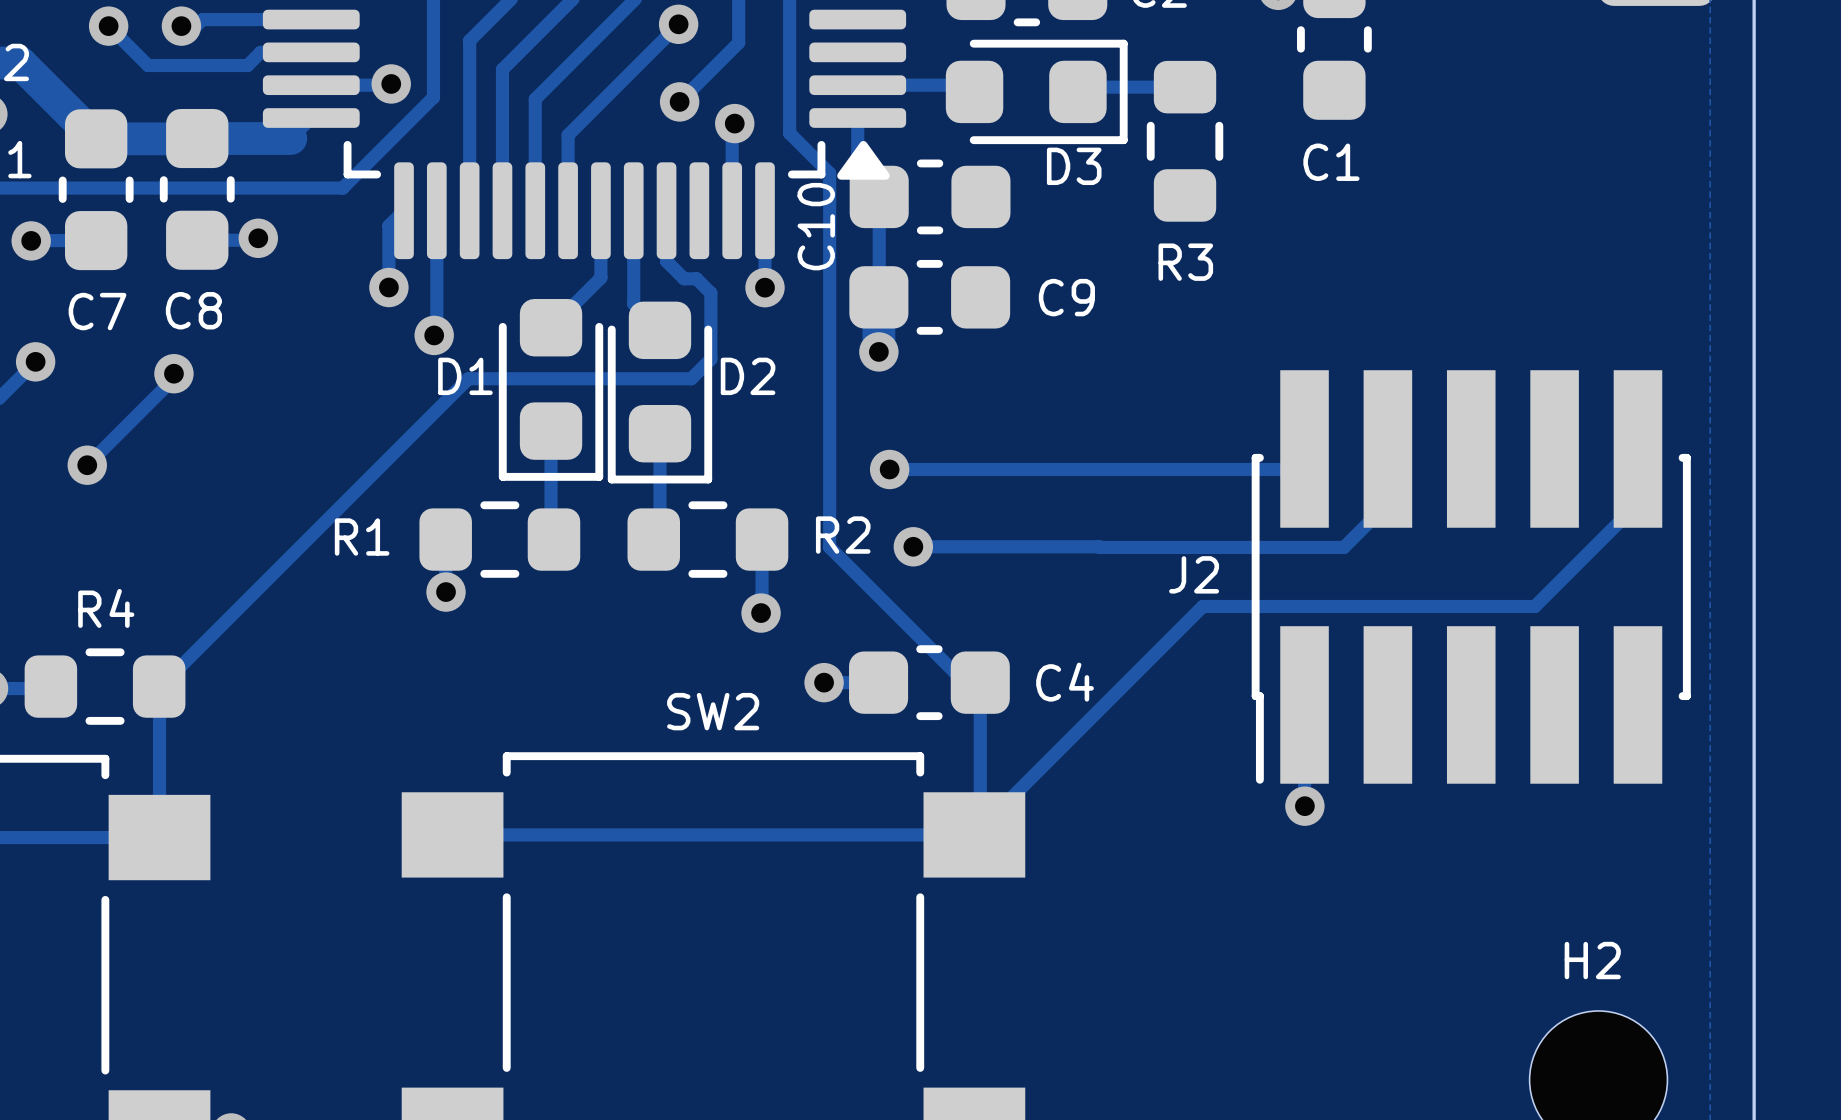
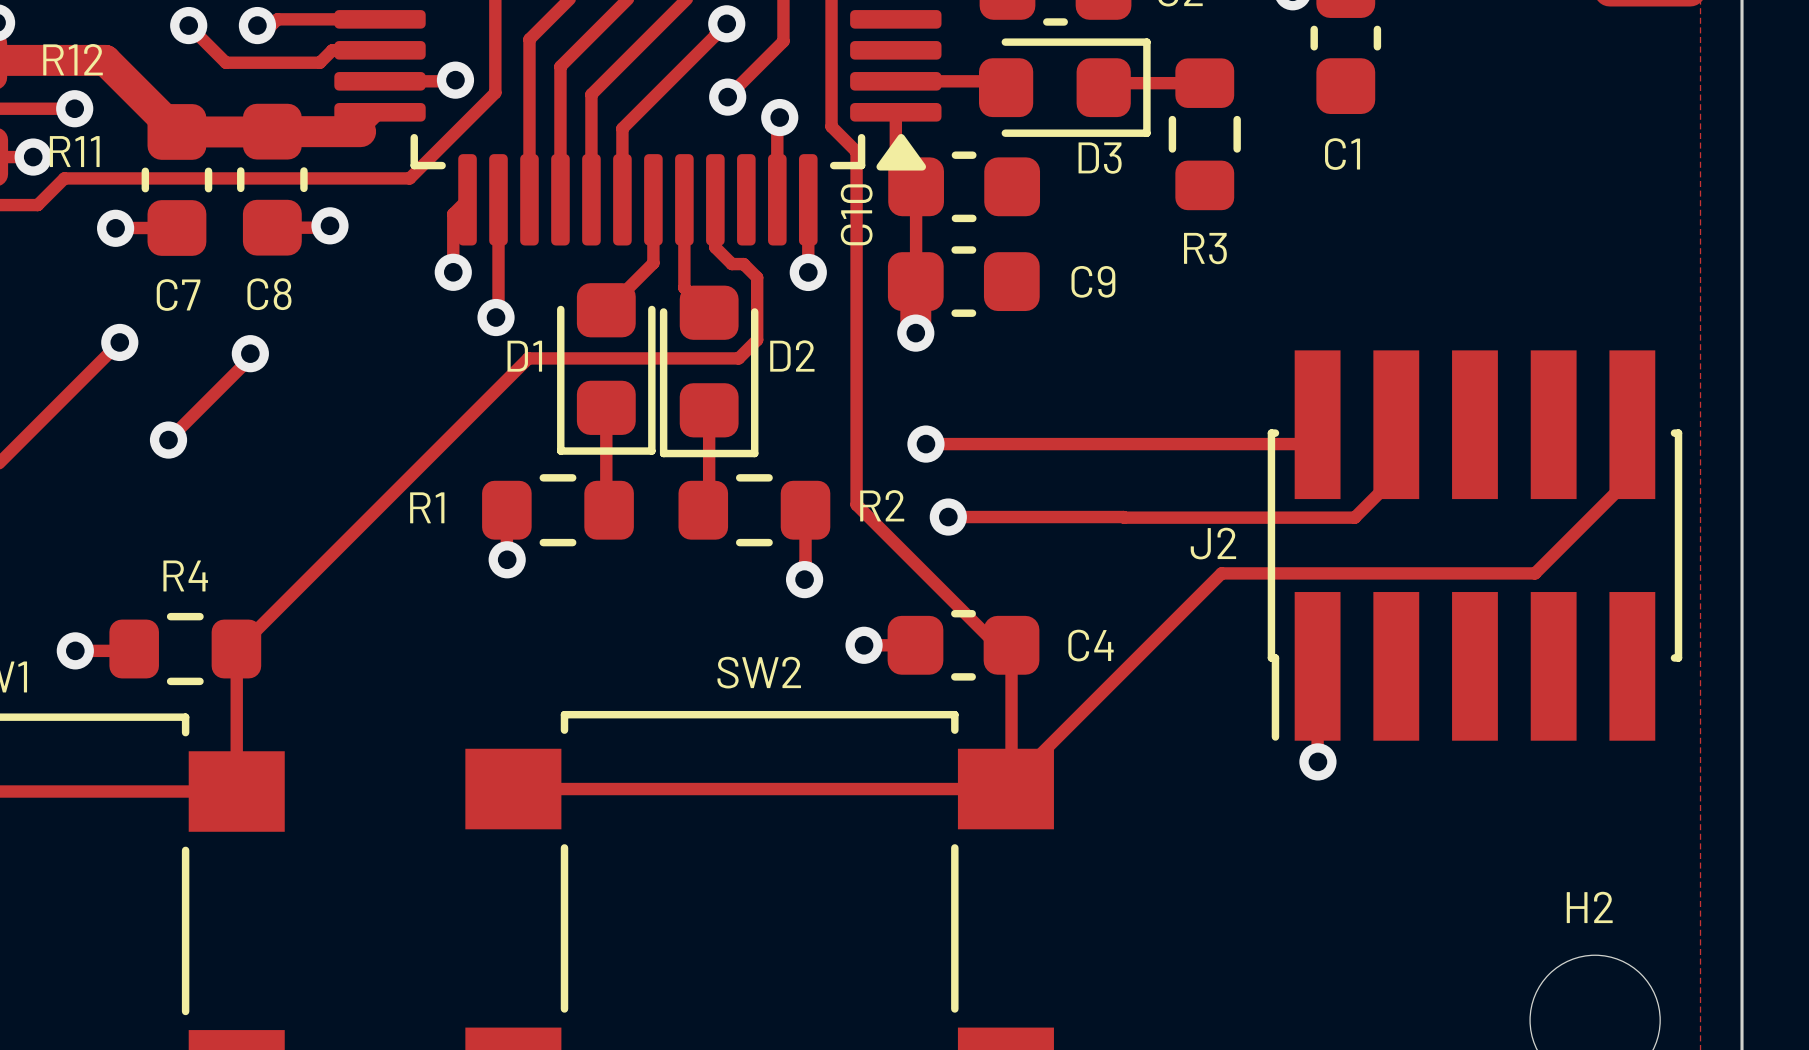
track: (816, 159) (829, 173) (829, 547) -> (856, 151) (856, 504) (869, 517)

